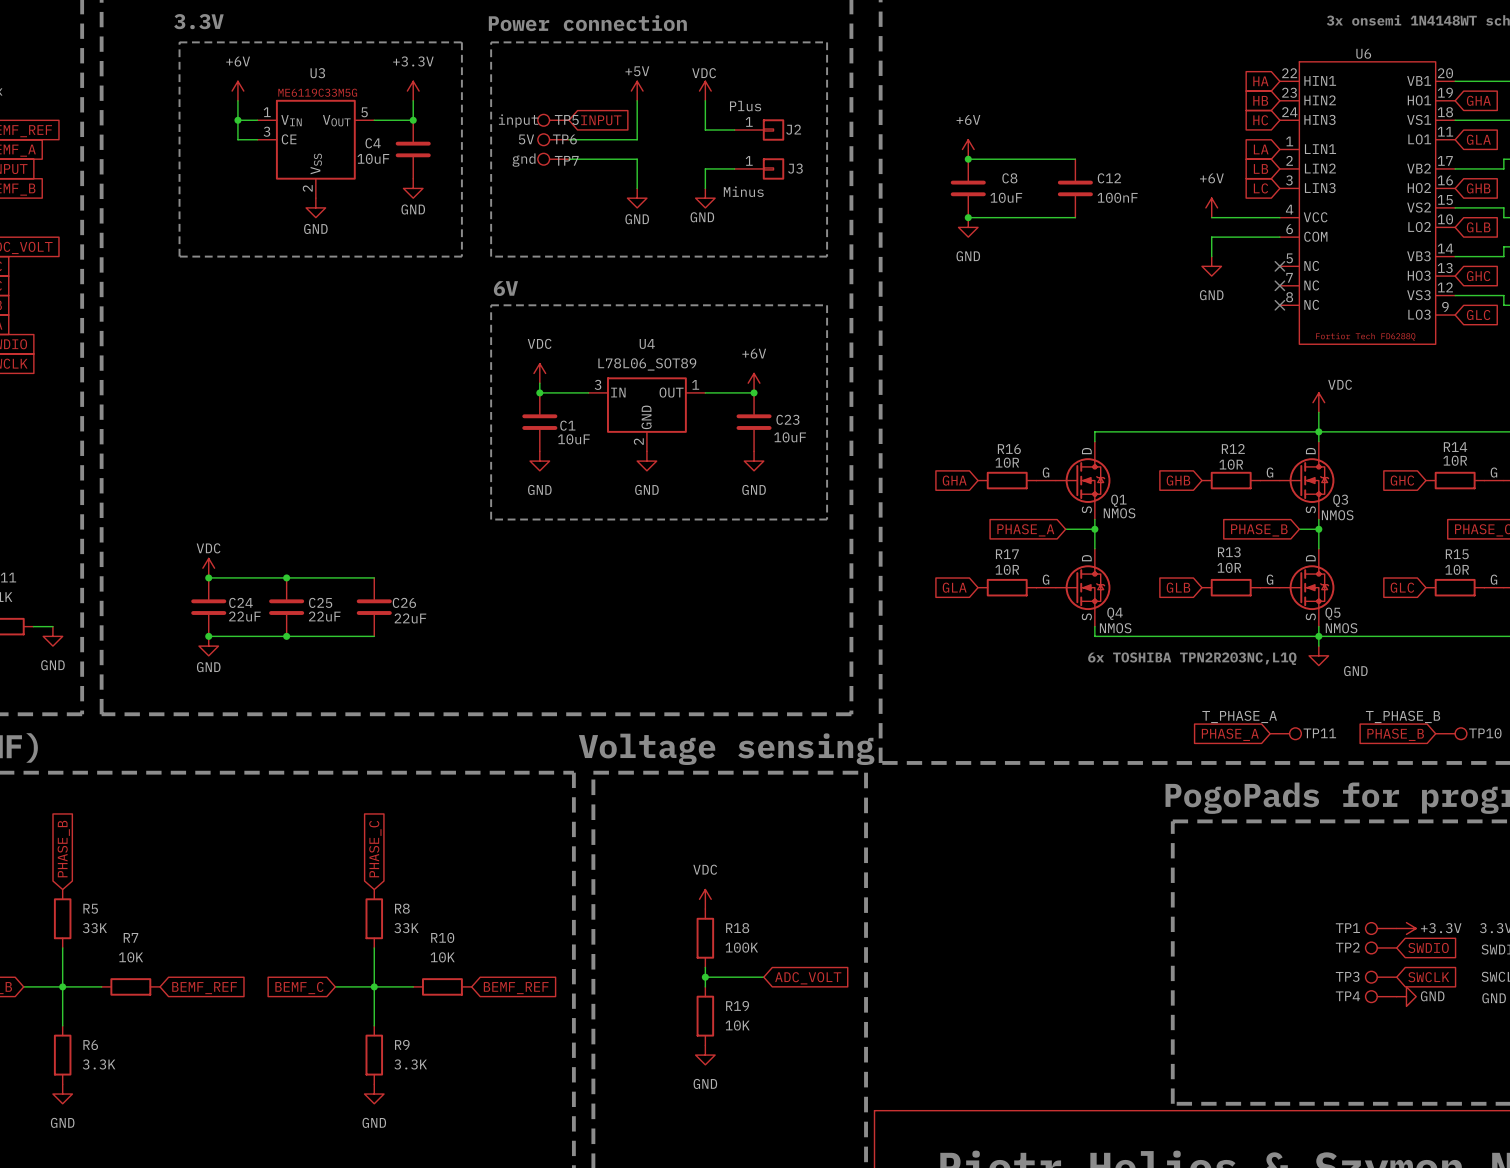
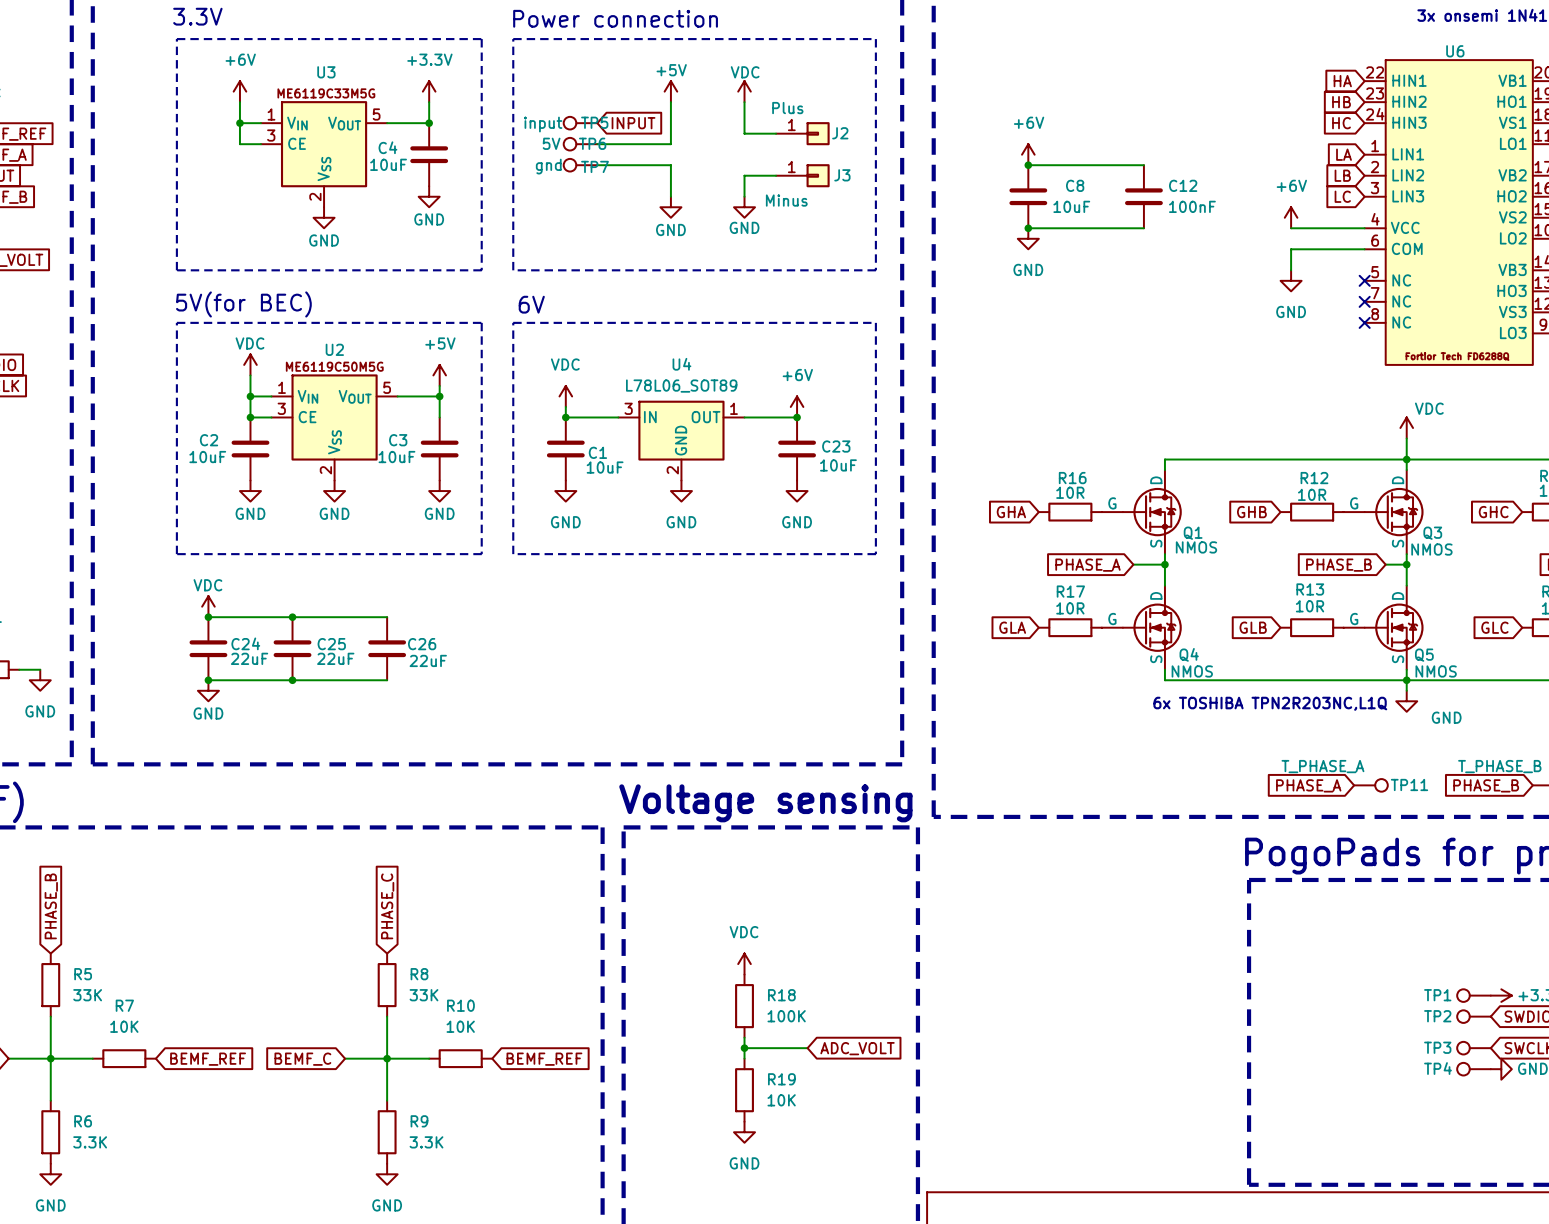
text: none -> 5V(for BEC) (243, 304)
line: none -> (176, 322) (481, 322) (481, 554) (176, 554) (176, 322)
power symbol: none -> VDC (250, 364)
wire: none -> (250, 375) (250, 417) (271, 417)
power symbol: none -> +5V (439, 375)
wire: none -> (439, 385) (439, 417)
wire: none -> (250, 396) (271, 396)
junction: none -> (250, 396)
wire: none -> (397, 396) (439, 396)
junction: none -> (439, 396)
junction: none -> (250, 417)
U2: none -> (334, 427)
C2: none -> 10uF (250, 449)
C3: none -> 10uF (439, 449)
power symbol: none -> GND (250, 491)
power symbol: none -> GND (334, 491)
power symbol: none -> GND (439, 491)

